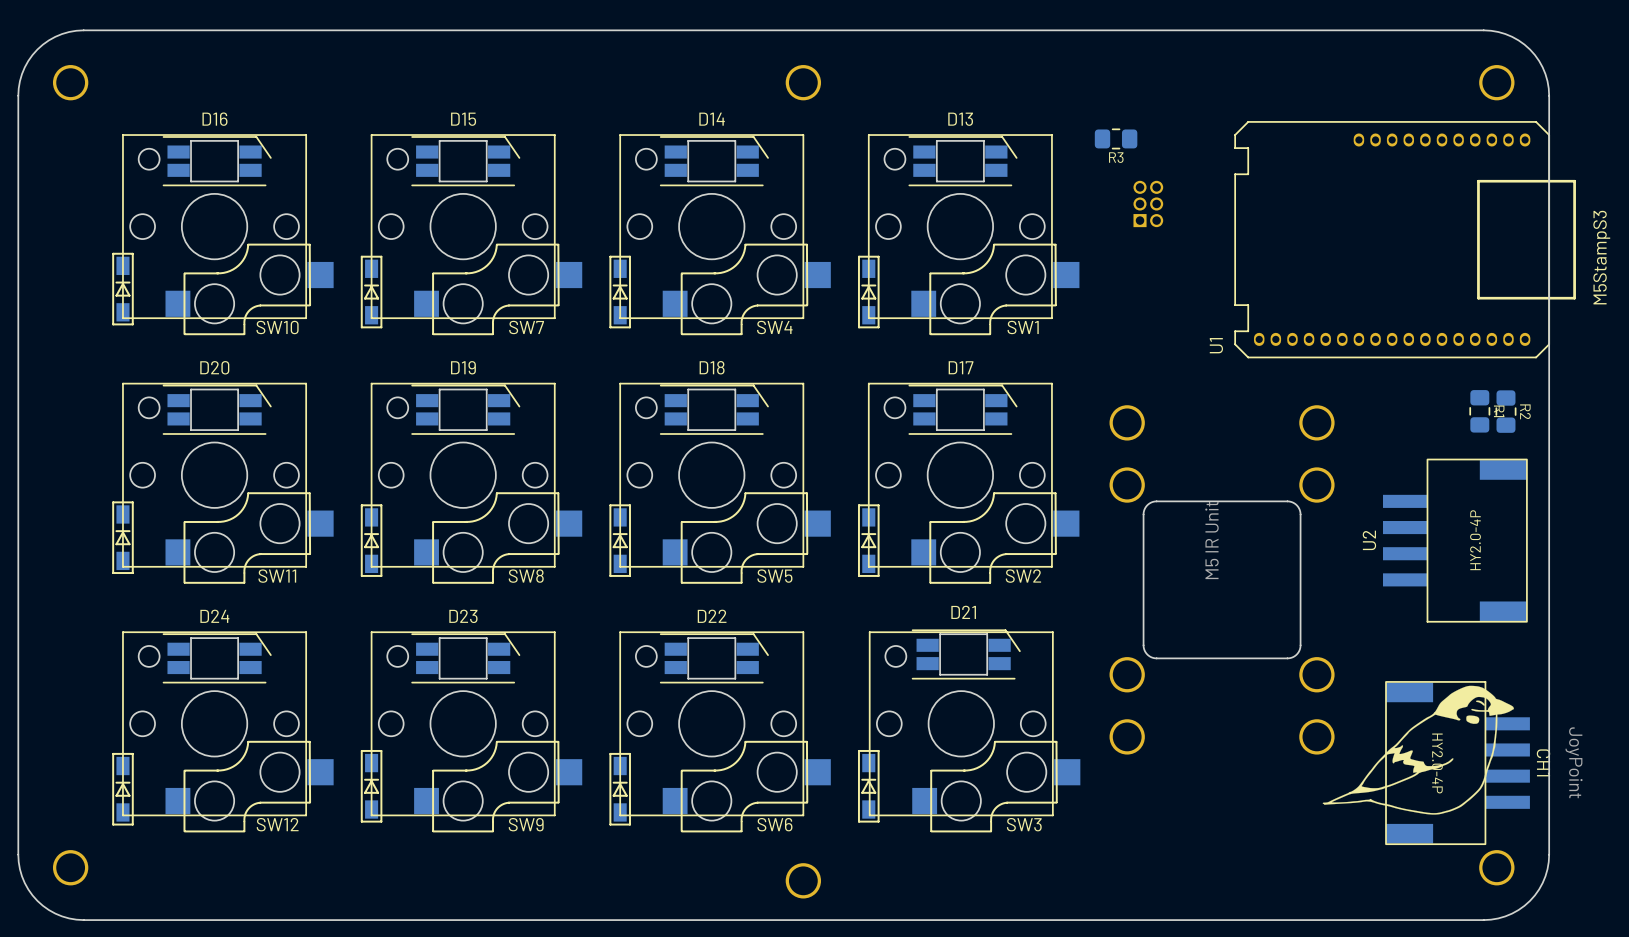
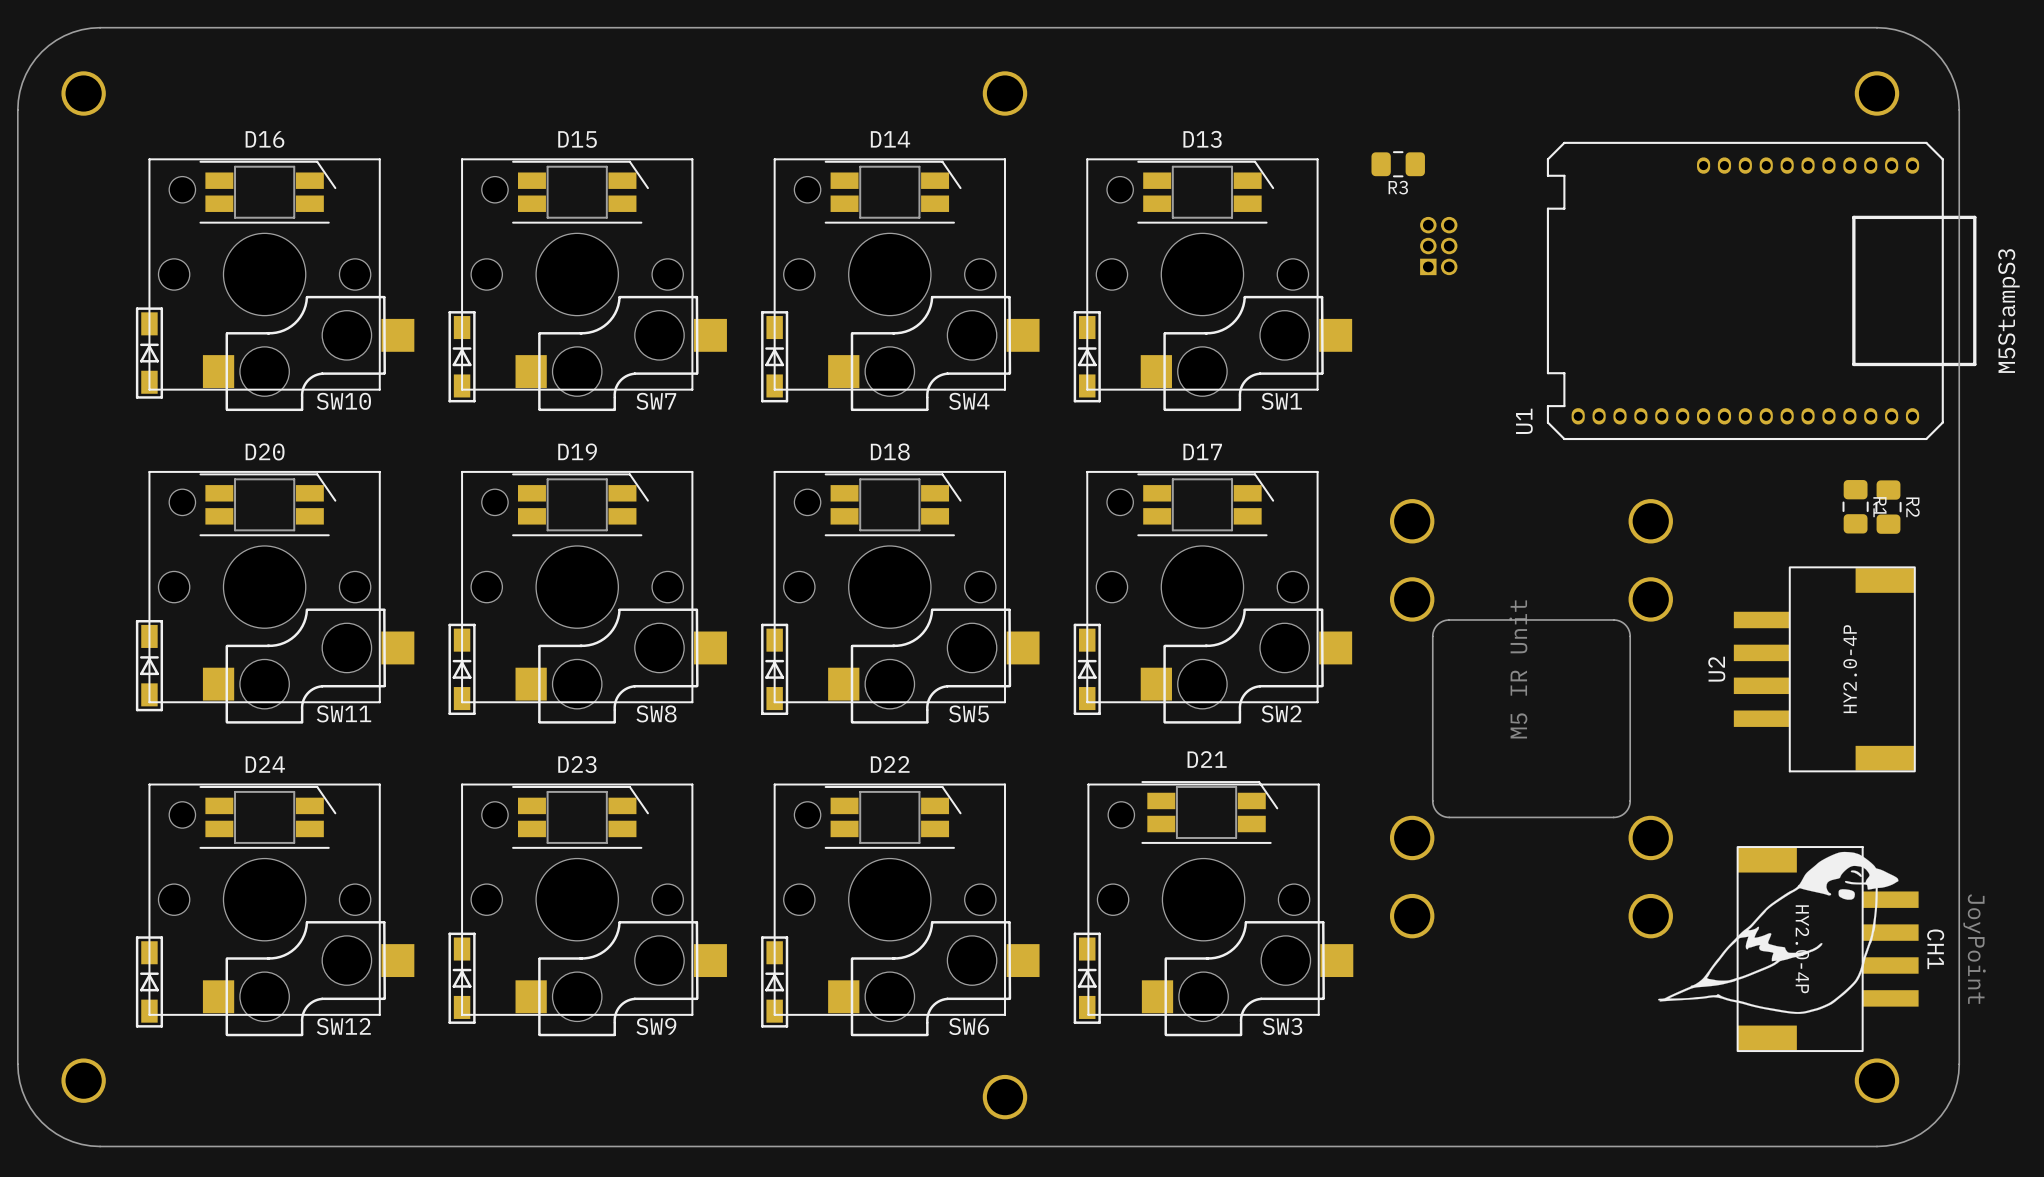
board edge: (1483, 30) (1498, 31) (1512, 36) (1530, 49) (1542, 67) (1547, 81) (1549, 95) (1548, 861) (1542, 883) (1534, 895) (1524, 905) (1505, 916) (1483, 920) -> (1860, 27) (1895, 29) (1912, 35) (1928, 45) (1941, 58) (1951, 74) (1957, 91) (1959, 109) (1958, 1073) (1951, 1099) (1941, 1115) (1928, 1128) (1912, 1138) (1895, 1144) (1860, 1146)

